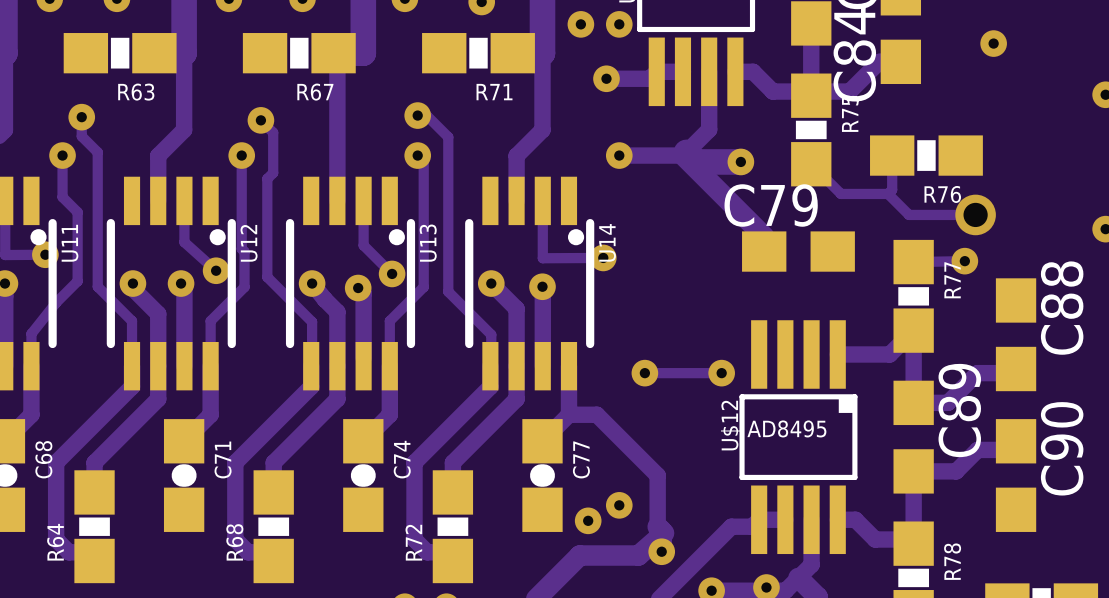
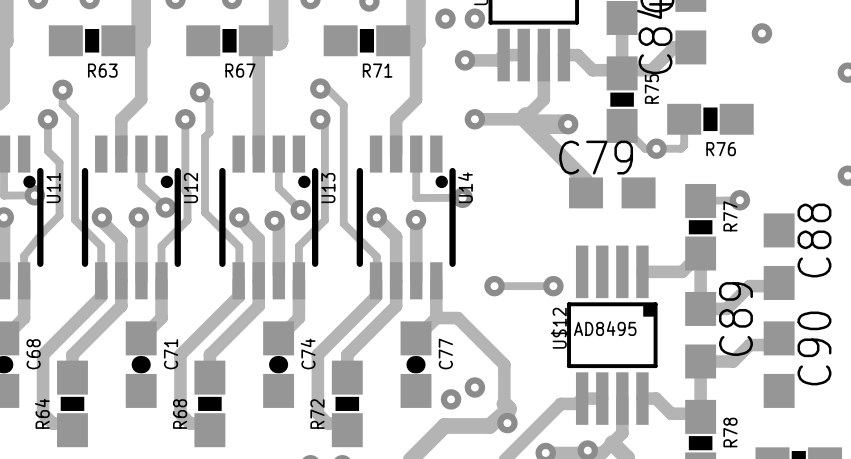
via: none -> (656, 148)
track: (888, 193) (909, 214) (975, 214) -> none
via: (975, 214) -> none

